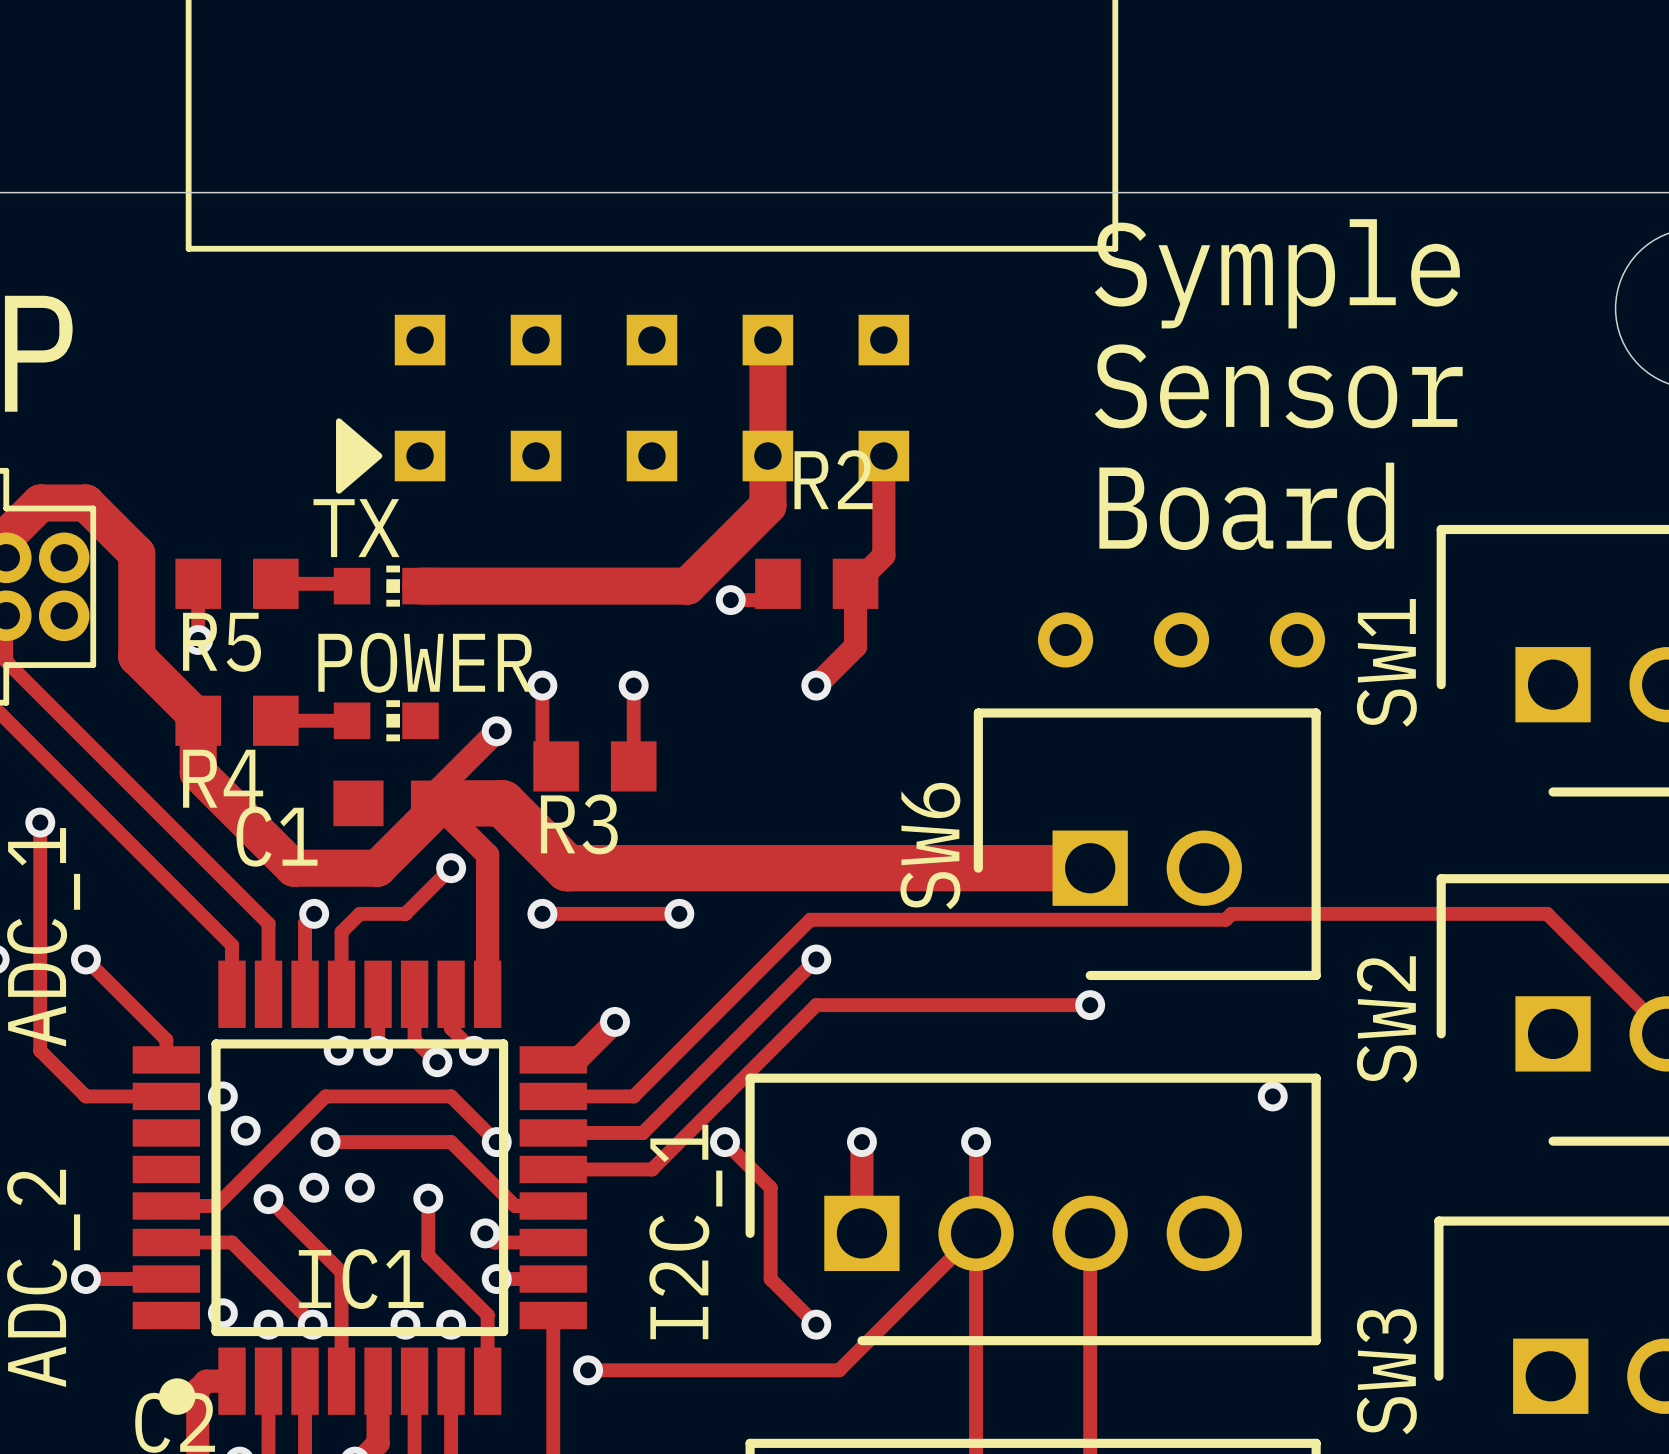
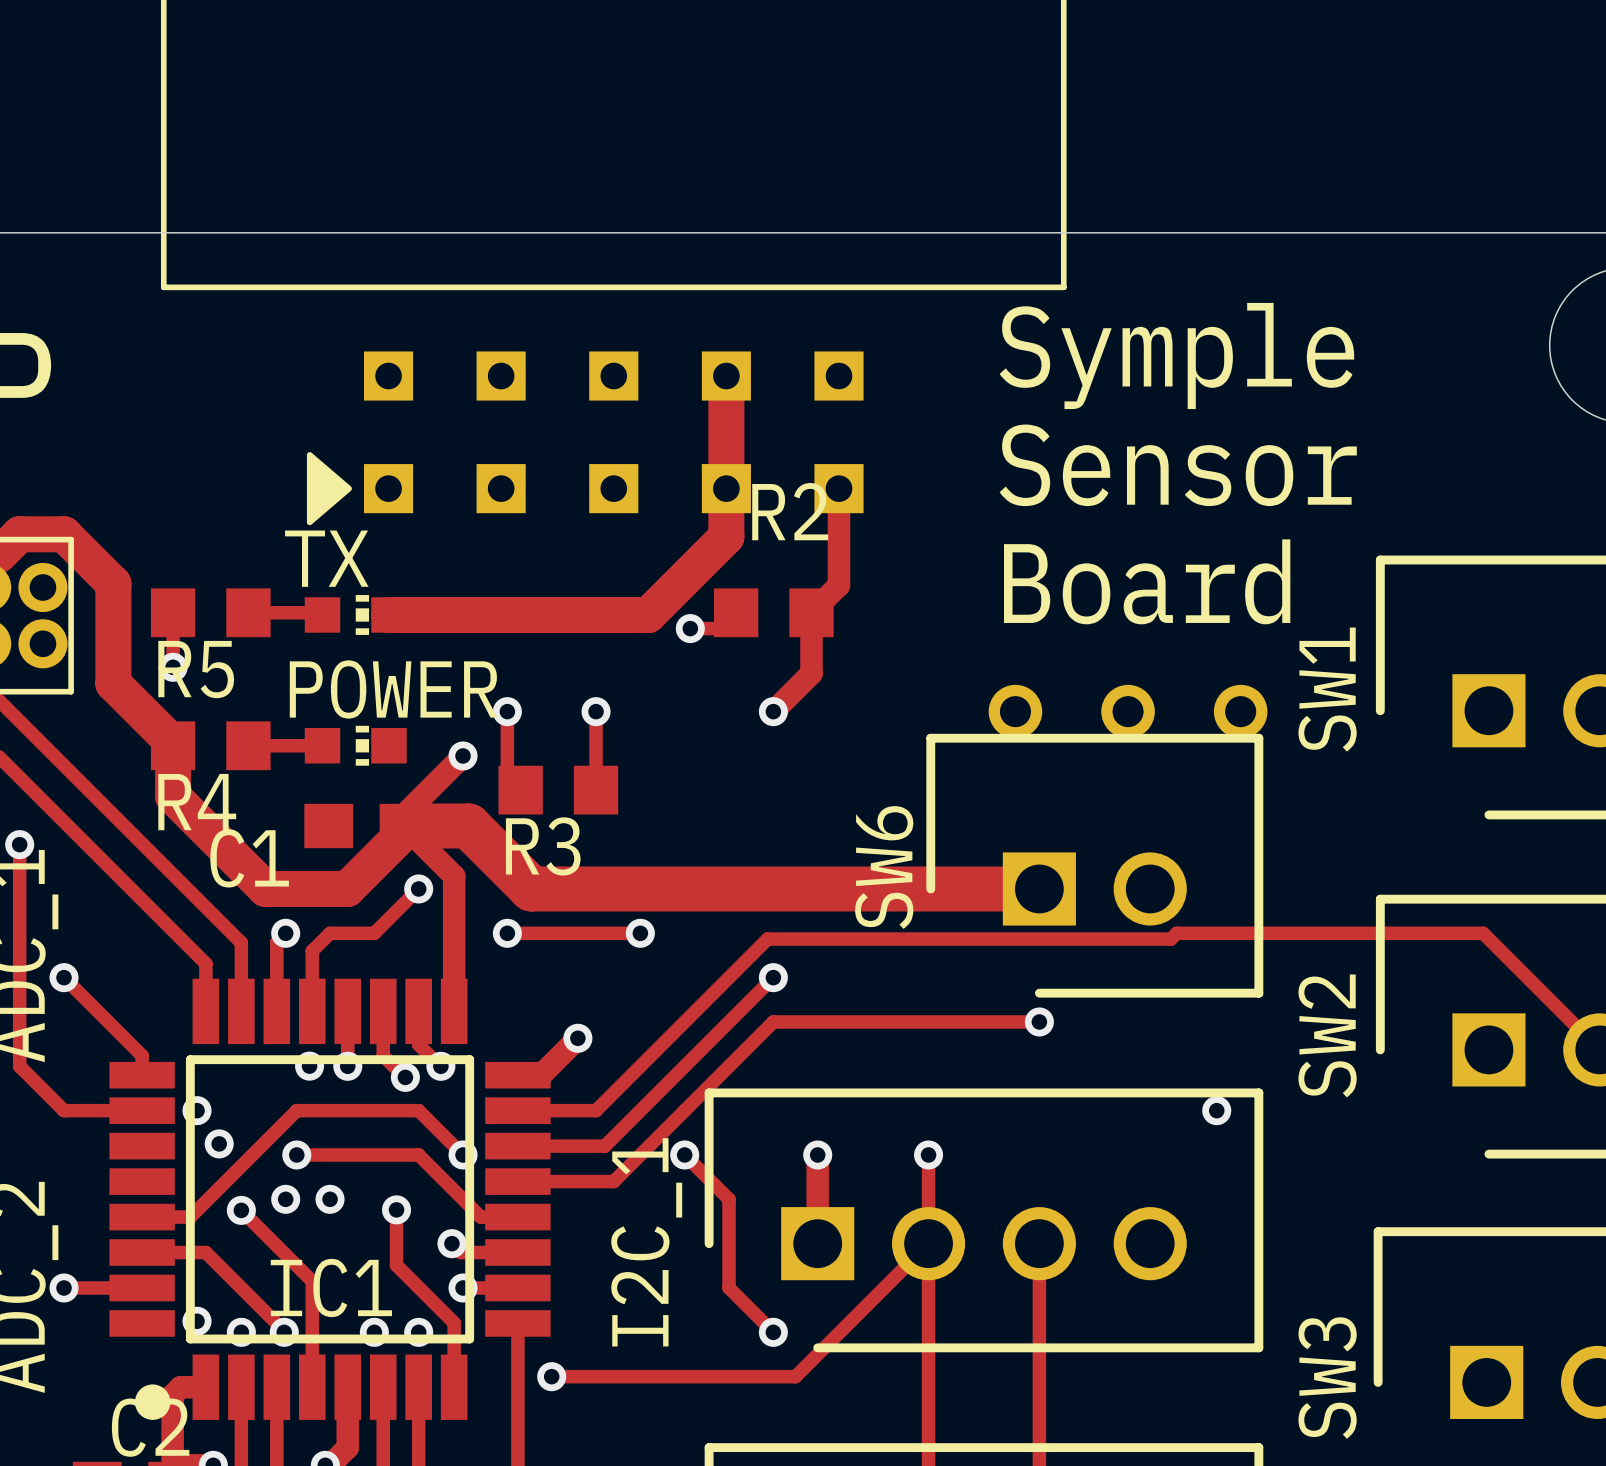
text position: Symple (1277, 273) -> Symple (1176, 355)
text position: Sensor (1278, 386) -> Sensor (1178, 465)
text position: Board (1246, 506) -> Board (1147, 581)
part position: (1181, 639) -> (1128, 711)

